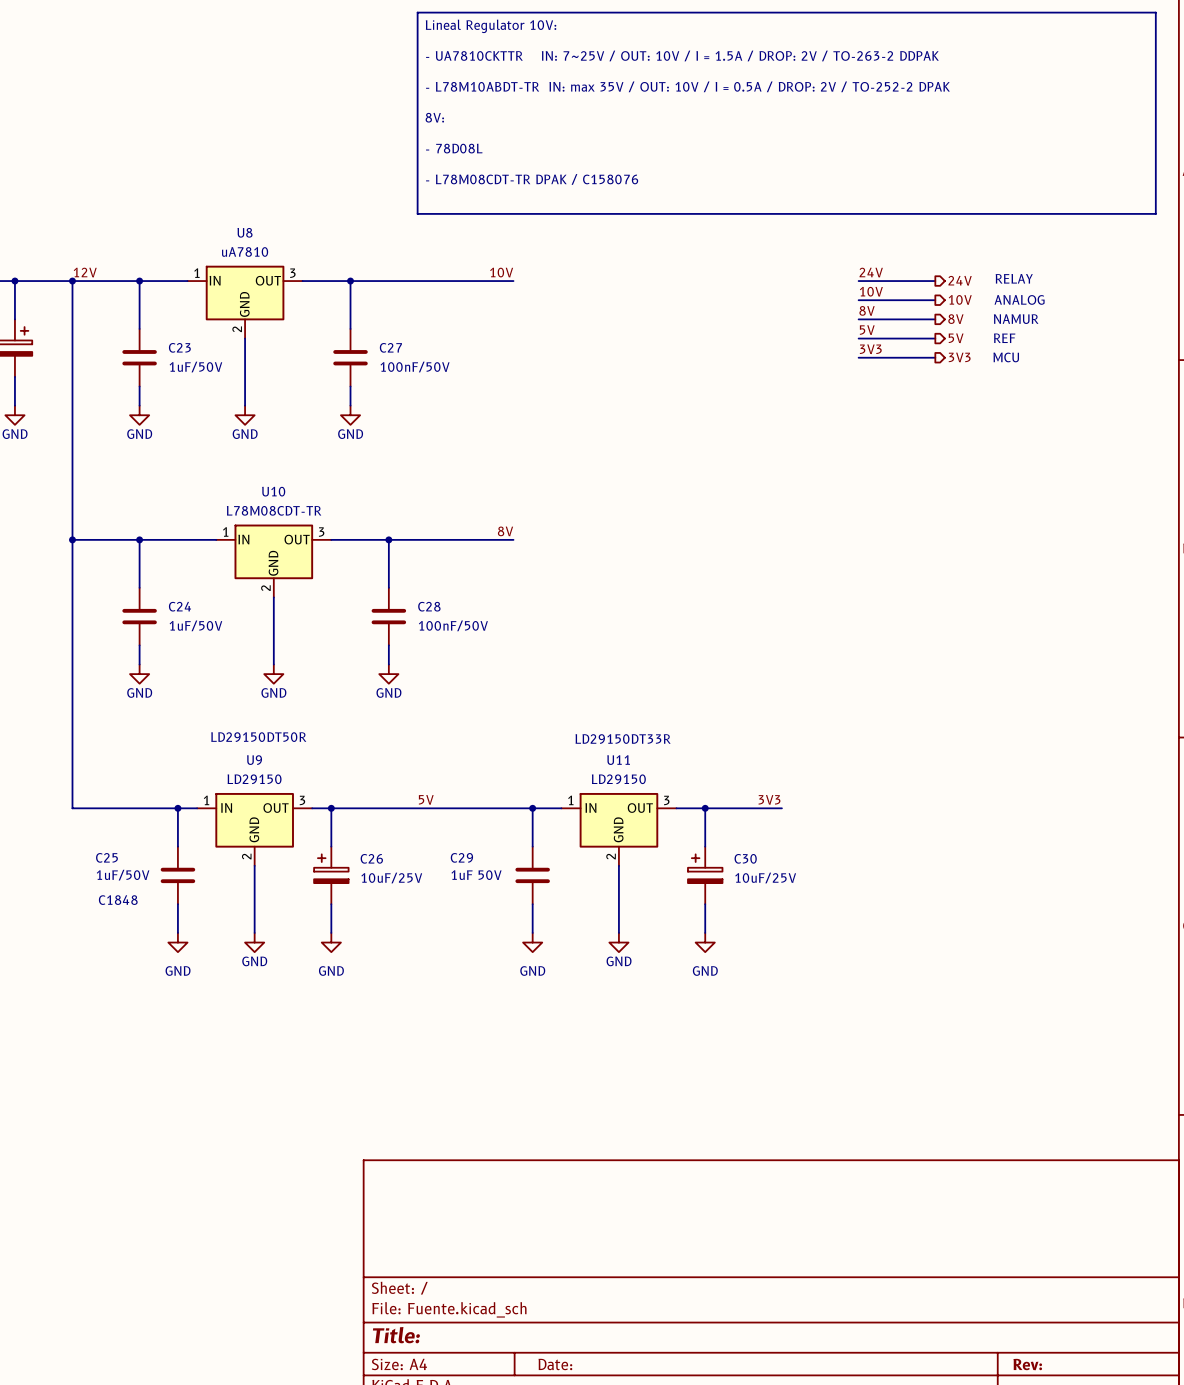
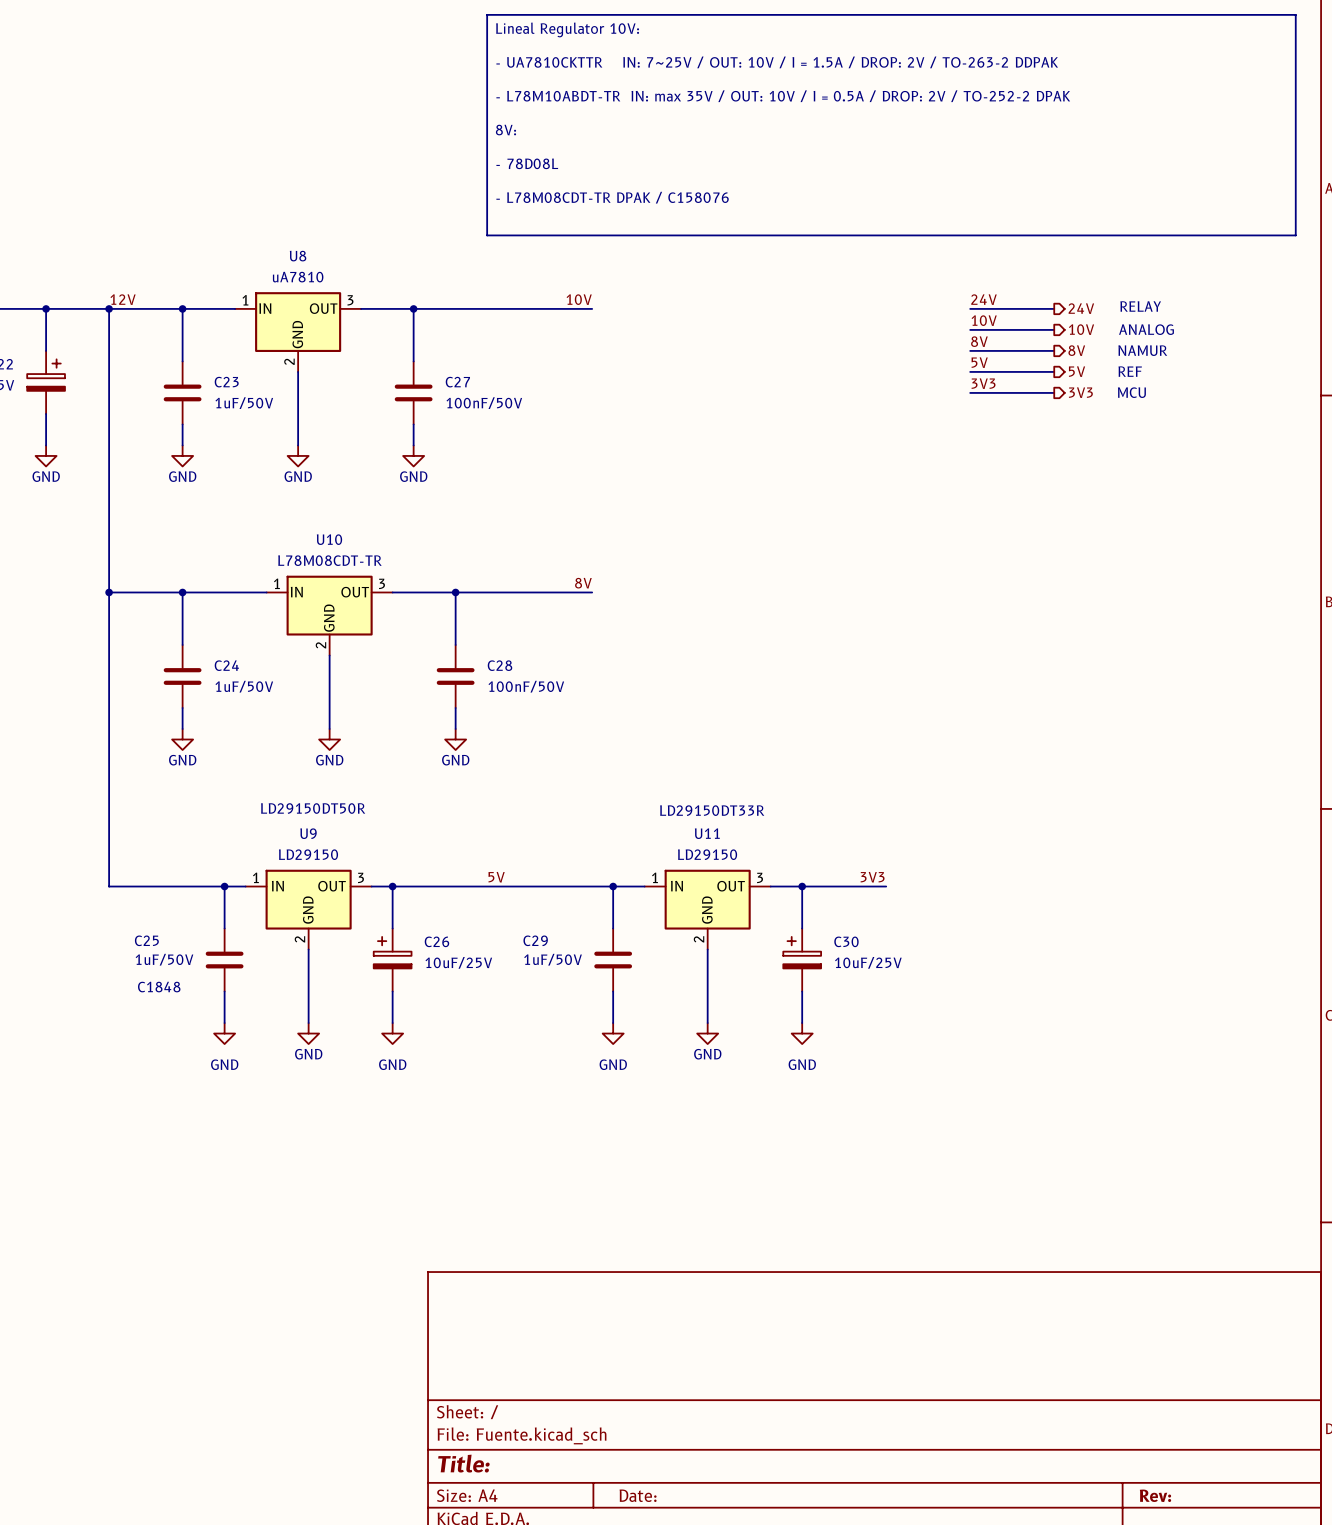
C29 value: 1uF 50V (476, 875) -> 1uF/50V (553, 959)

